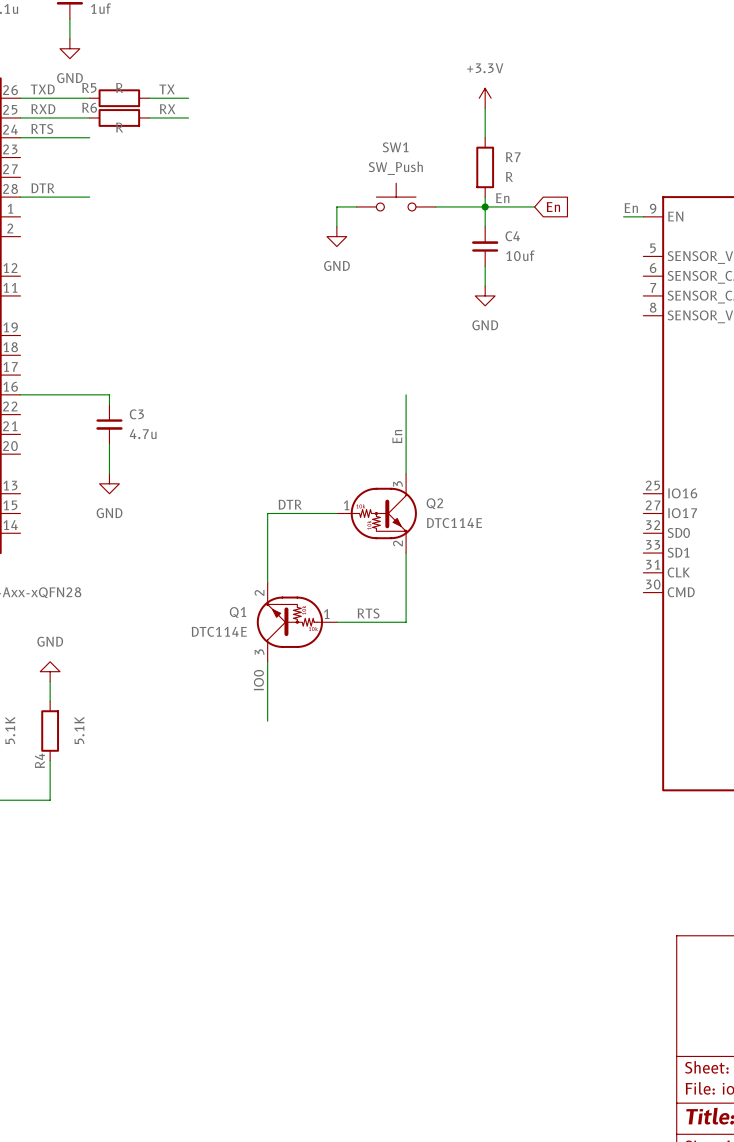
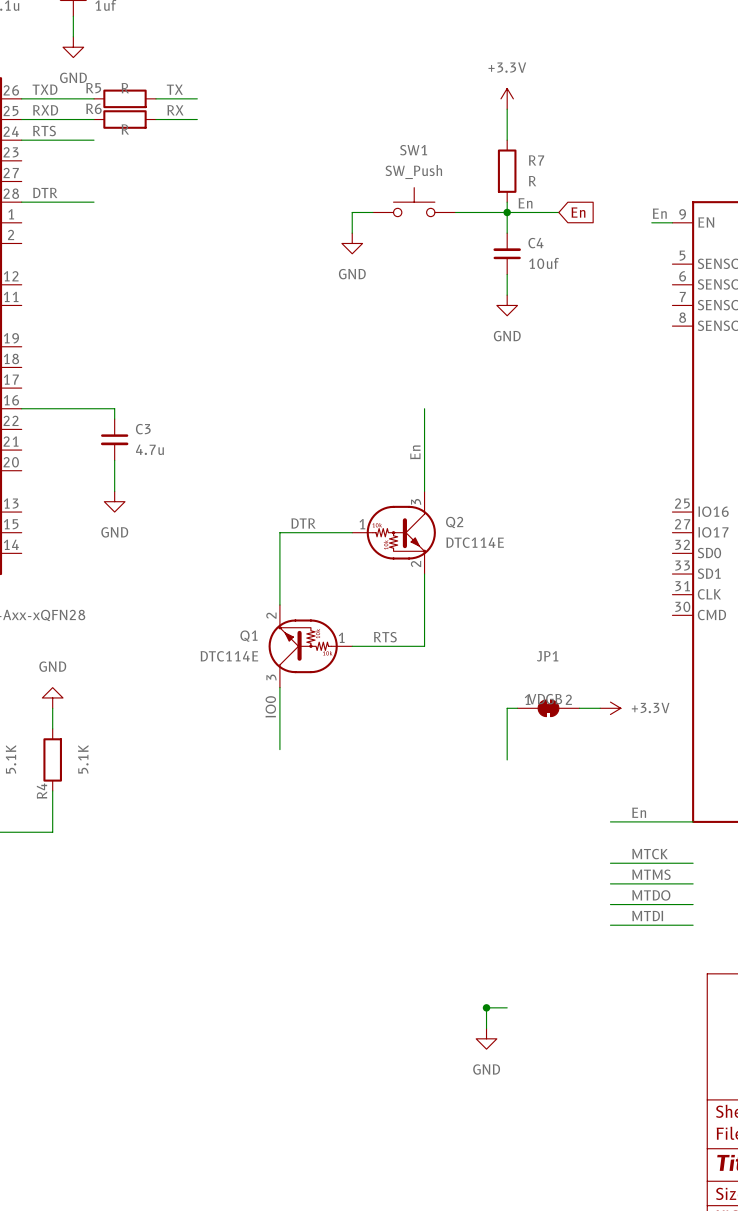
label: none -> VDGB (545, 699)
wire: none -> (517, 708) (507, 708) (507, 759)
JP1: none -> (548, 708)
wire: none -> (579, 708) (600, 708)
power symbol: none -> +3.3V (610, 708)
label: none -> En (639, 812)
wire: none -> (610, 821) (693, 821)
label: none -> MTCK (650, 854)
wire: none -> (610, 863) (693, 863)
label: none -> MTMS (651, 874)
wire: none -> (610, 883) (693, 883)
label: none -> MTDO (651, 895)
wire: none -> (610, 904) (693, 904)
label: none -> MTDI (647, 916)
wire: none -> (610, 925) (693, 925)
junction: none -> (486, 1007)
wire: none -> (507, 1007) (486, 1007) (486, 1028)
power symbol: none -> GND (486, 1038)

